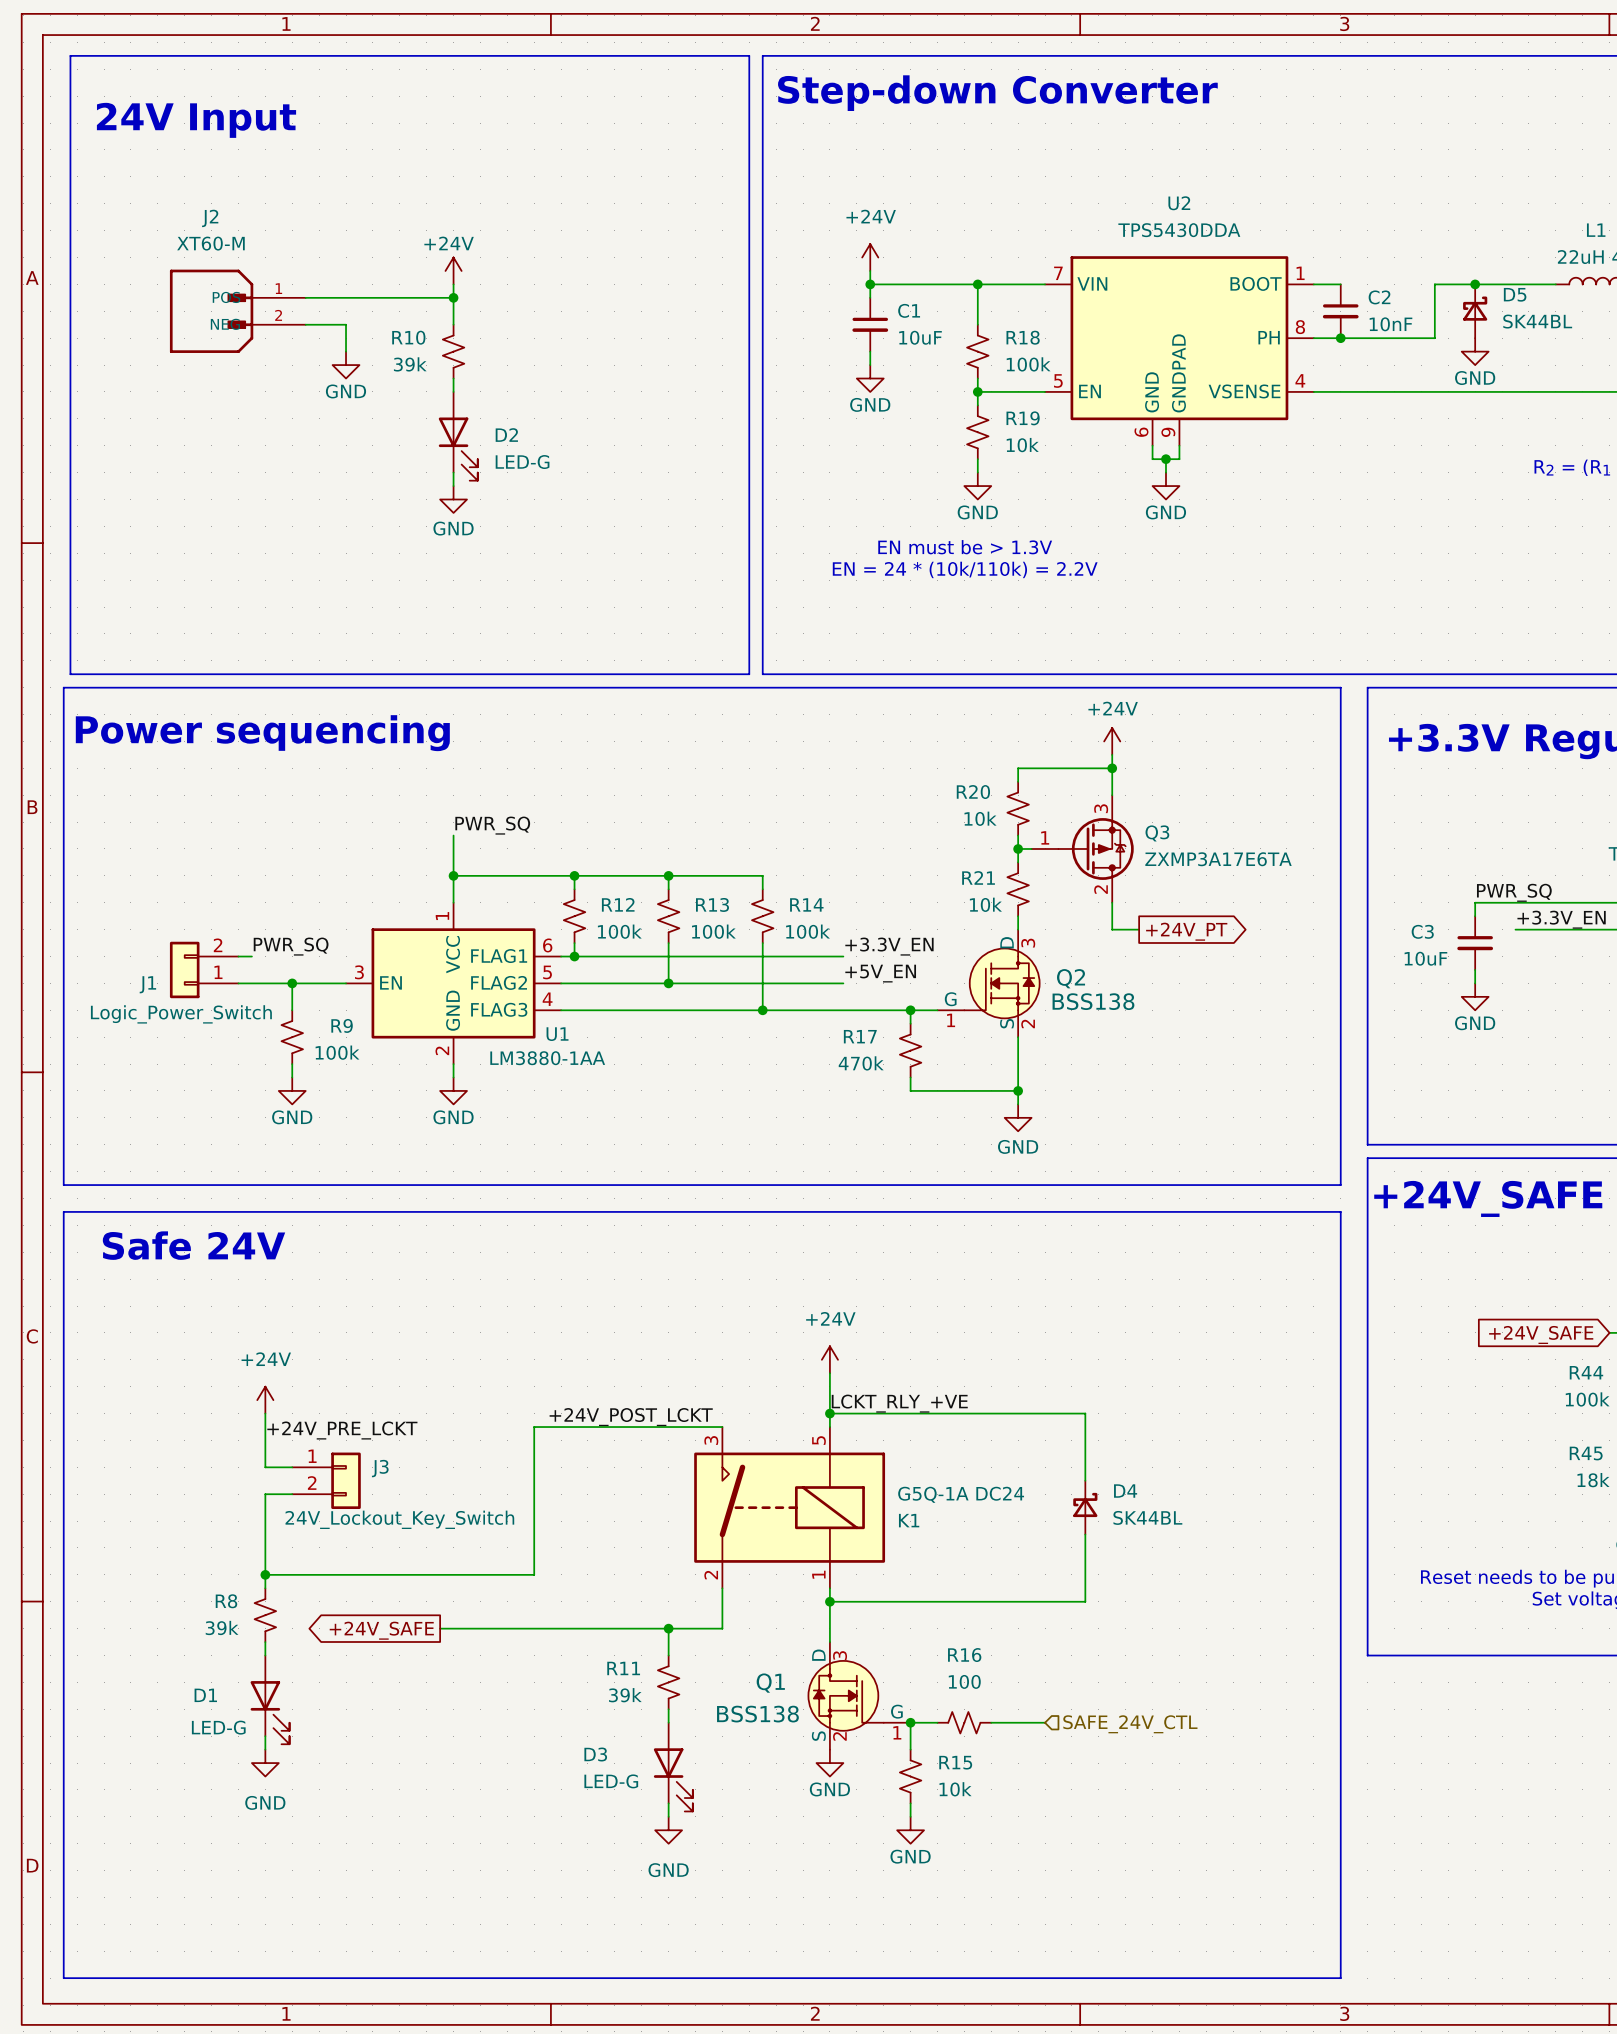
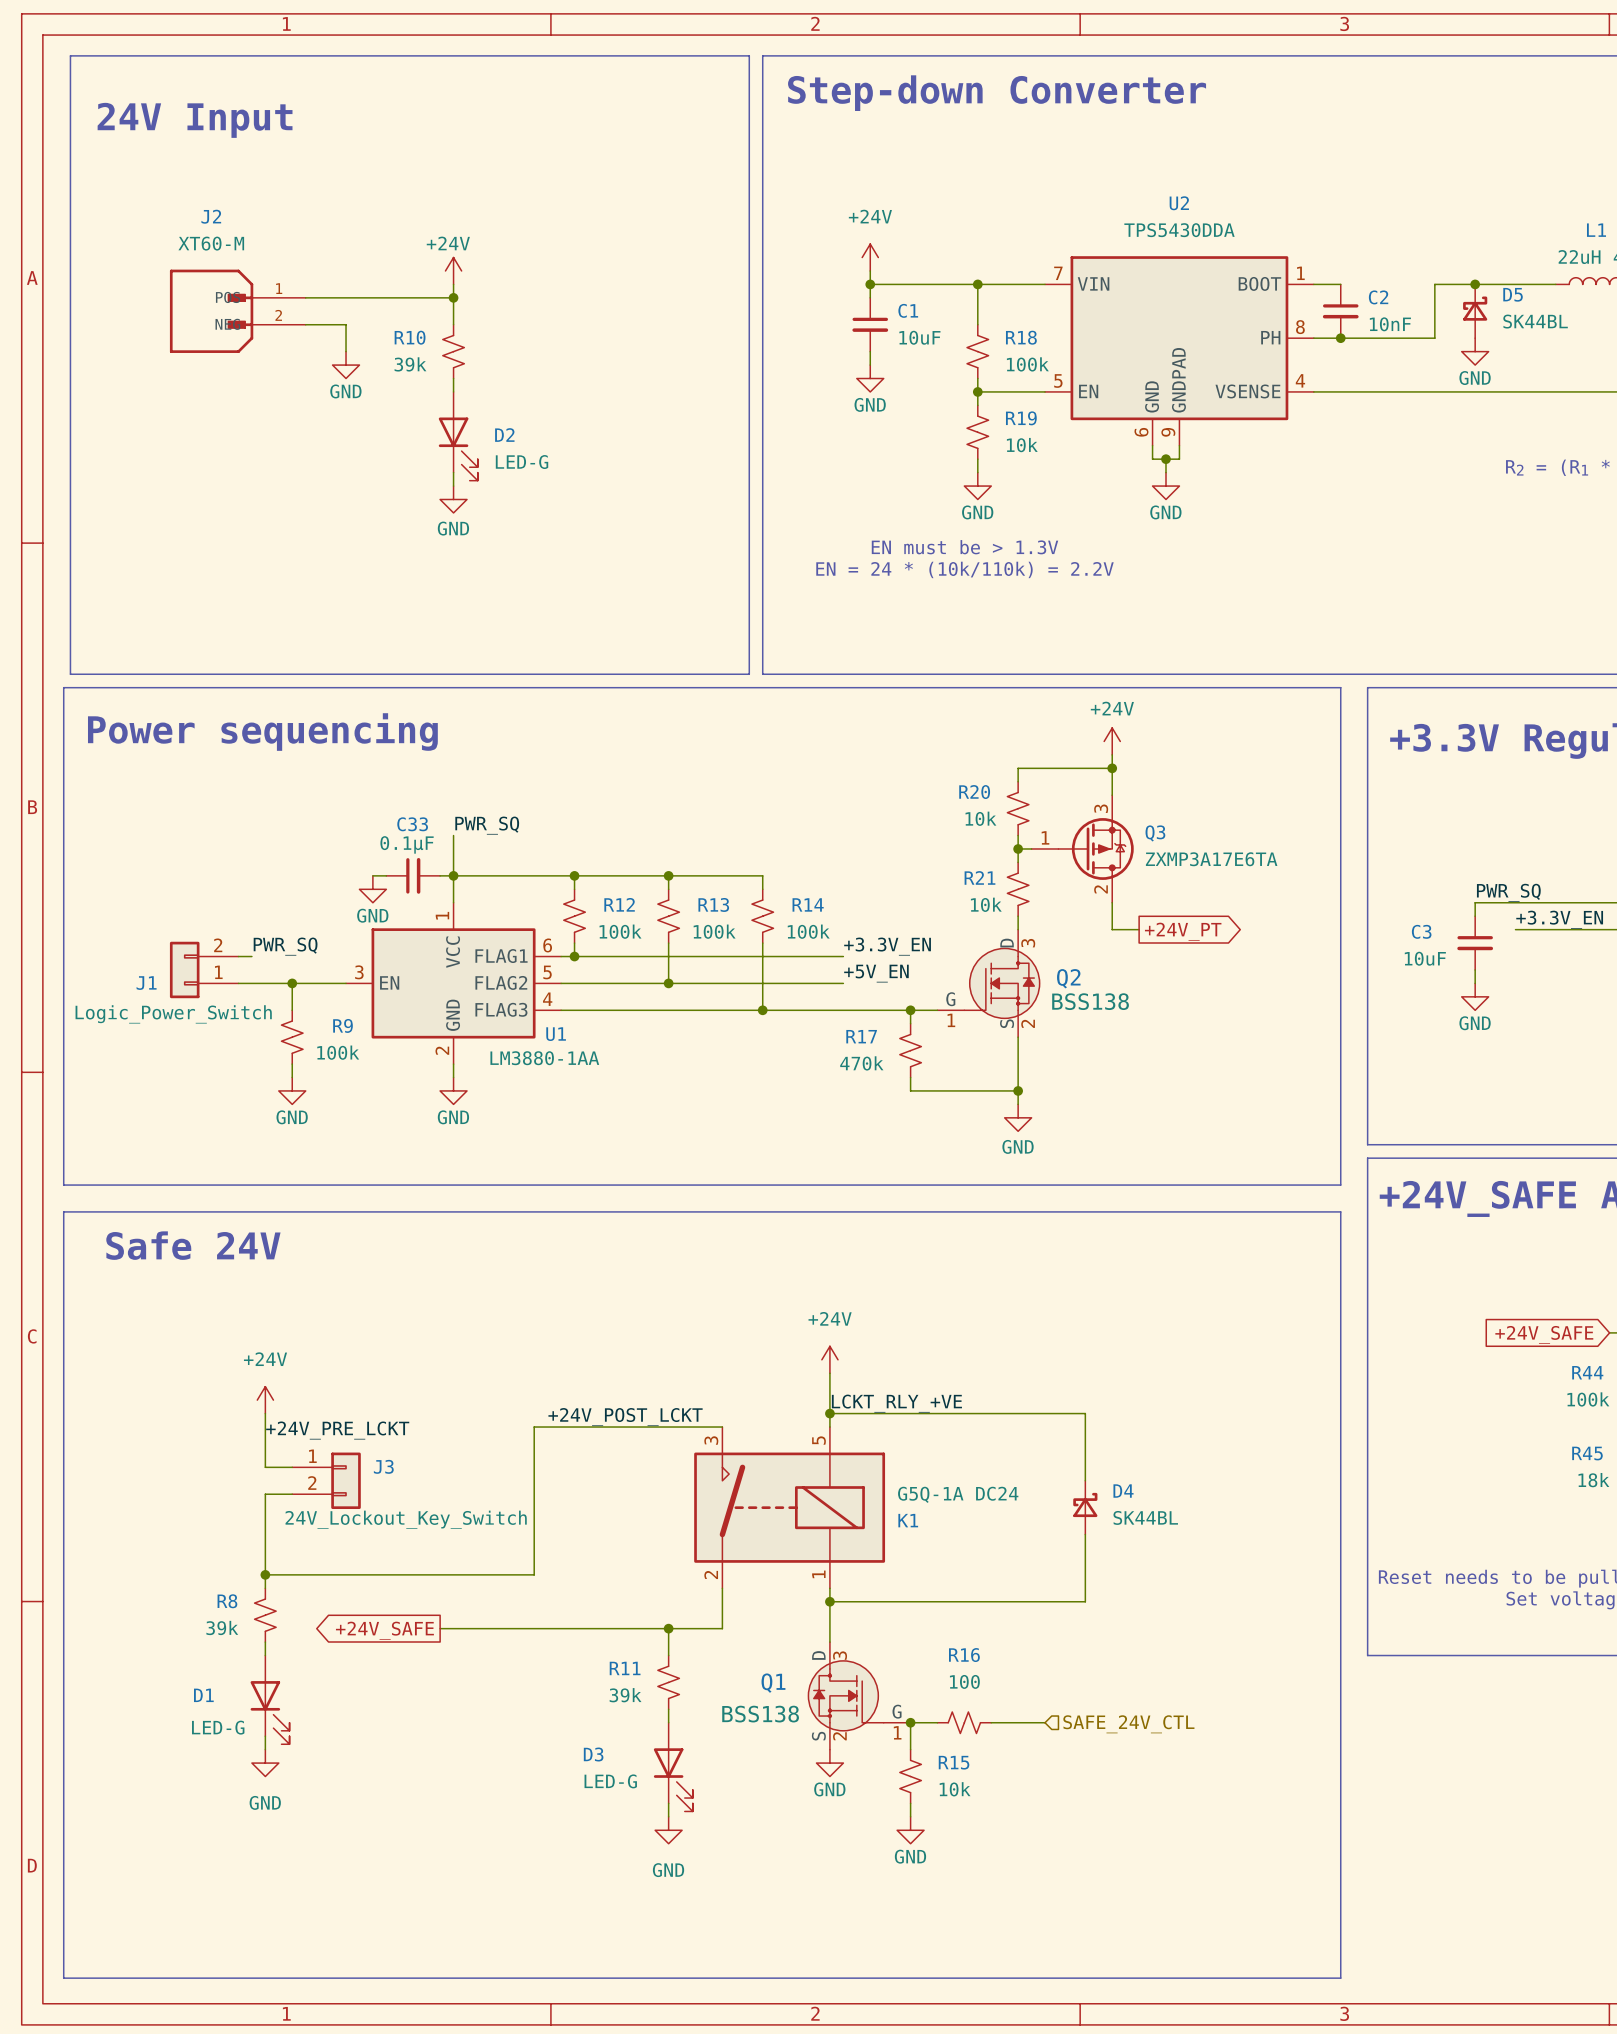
wire: none -> (372, 875) (386, 875)
C33: none -> 0.1μF (413, 875)
wire: none -> (440, 875) (453, 875)
power symbol: none -> GND (372, 889)

